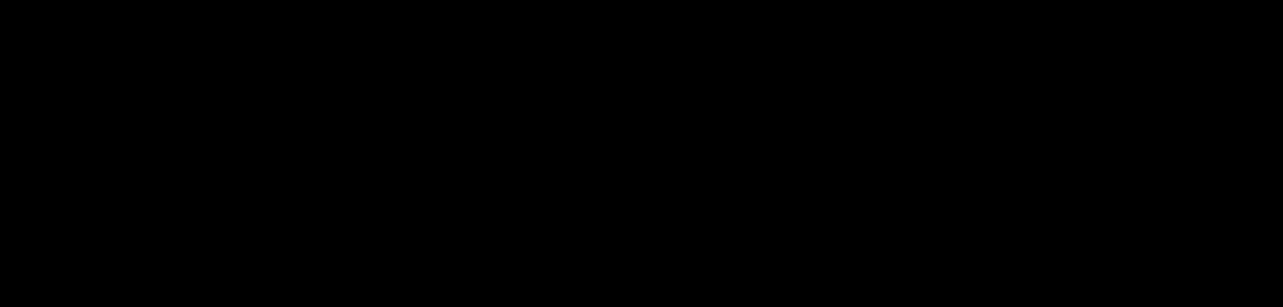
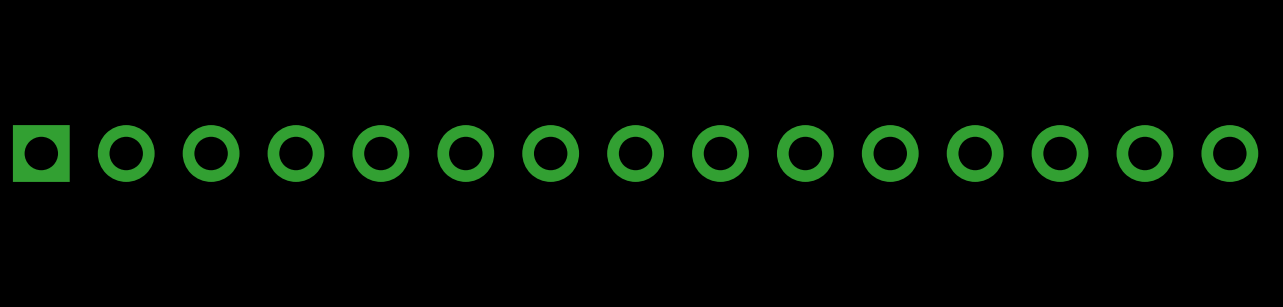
part: none -> (635, 153)

